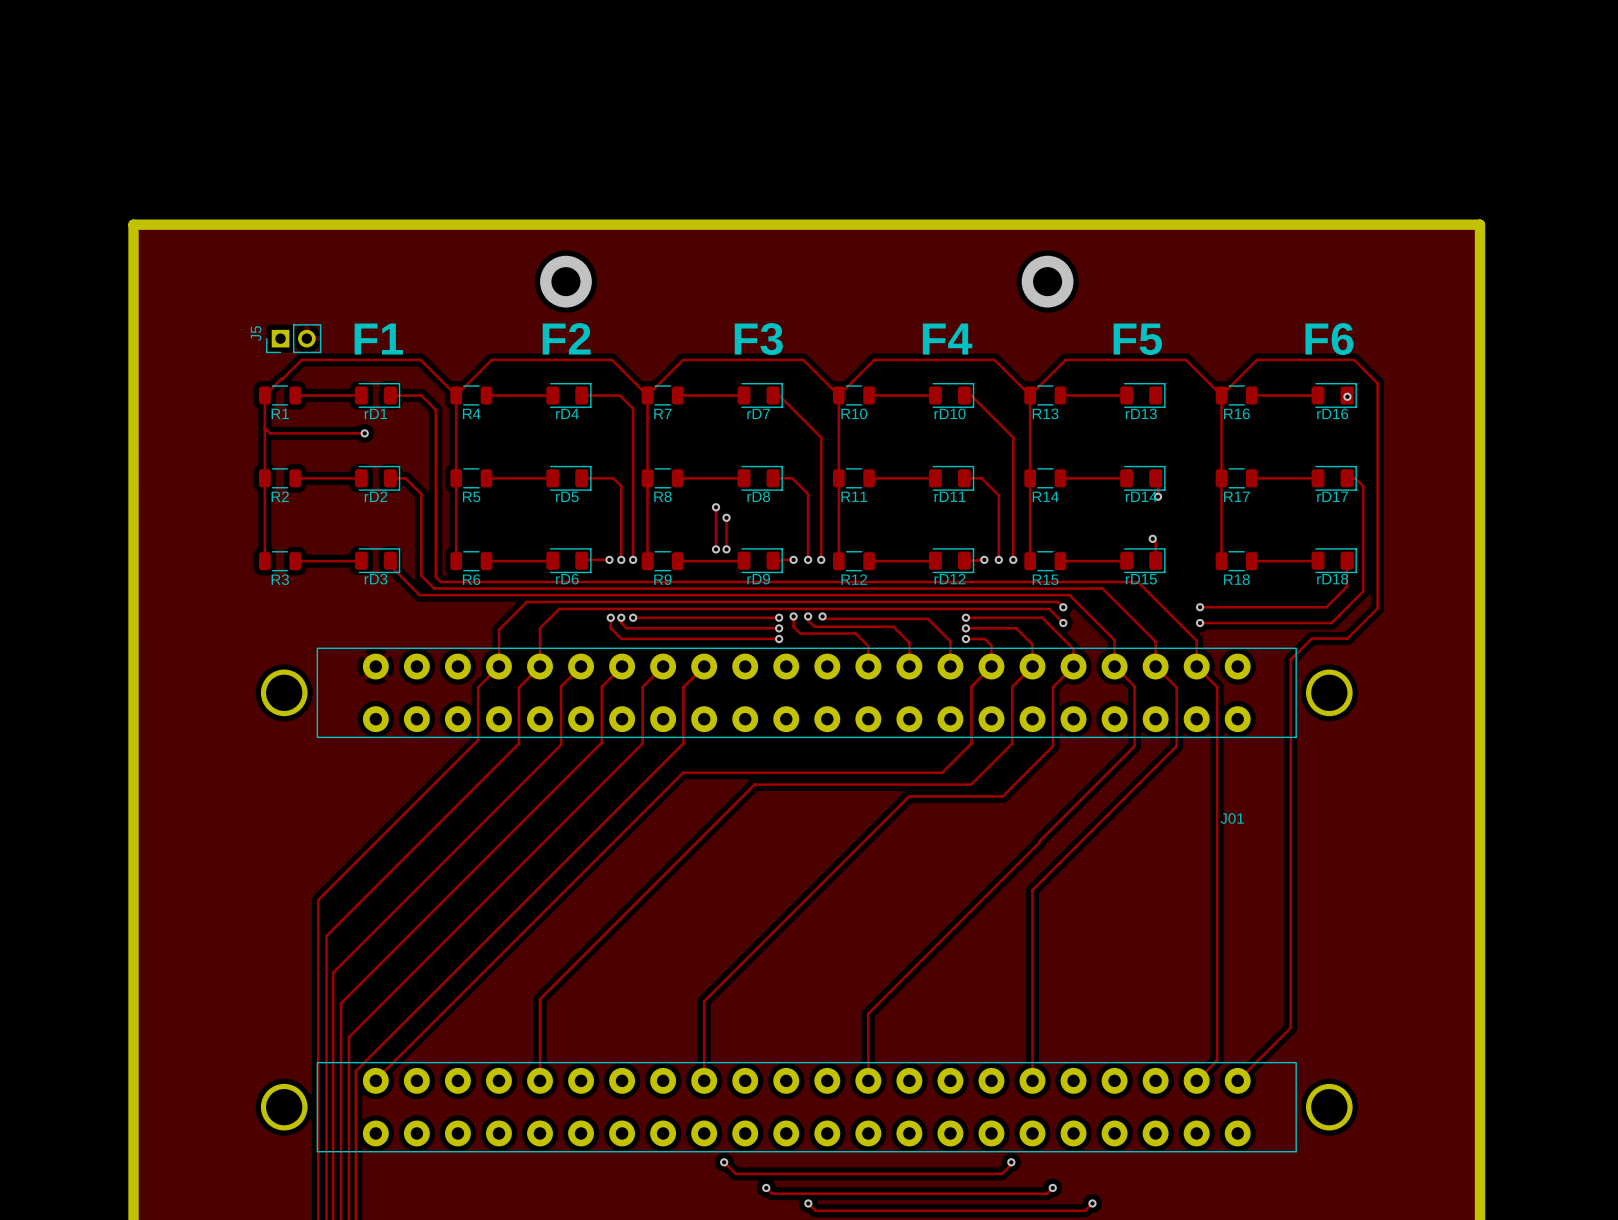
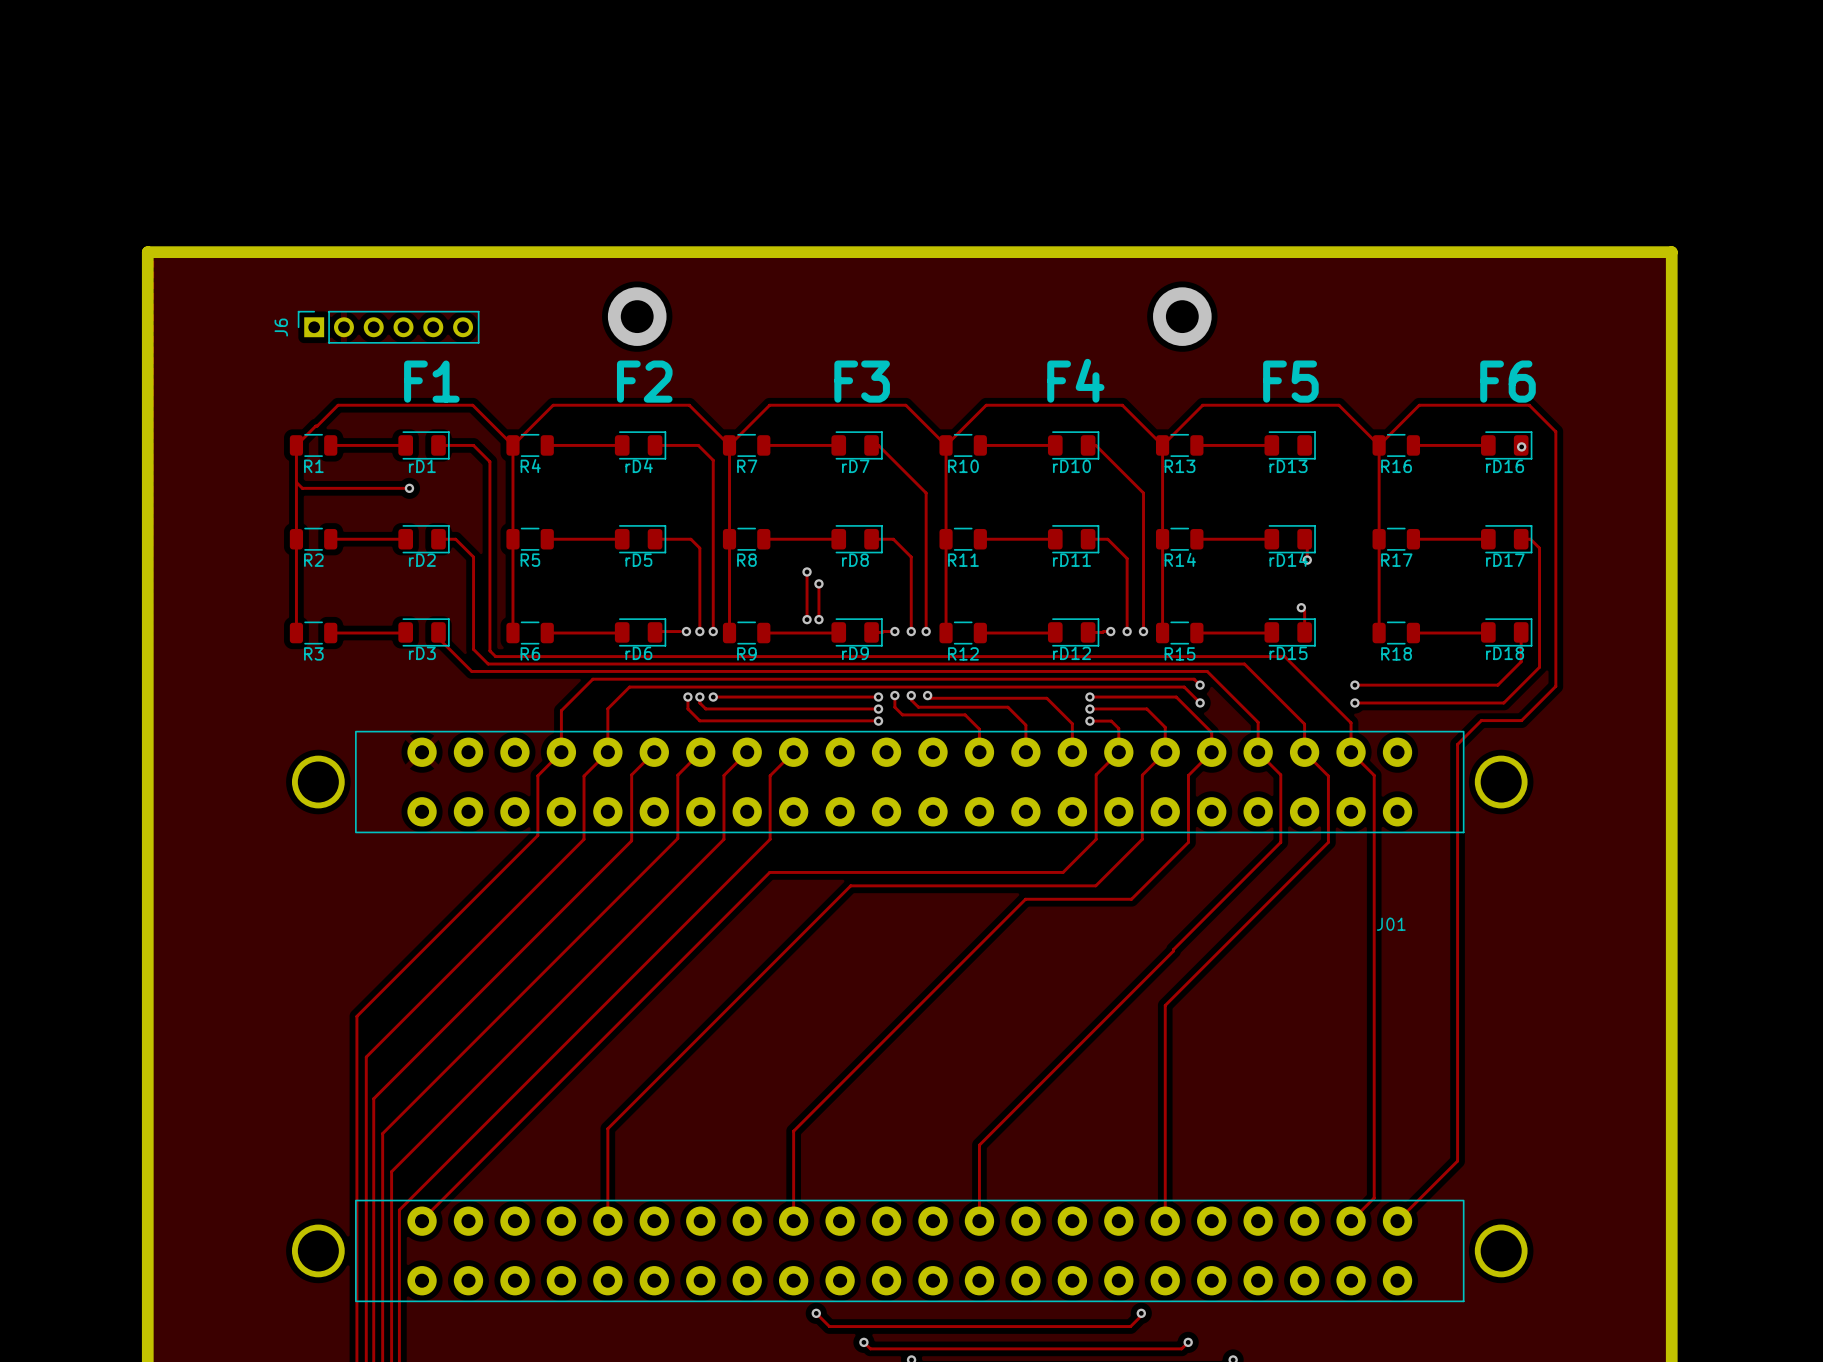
J6: none -> (388, 327)
J5: (293, 338) -> none

